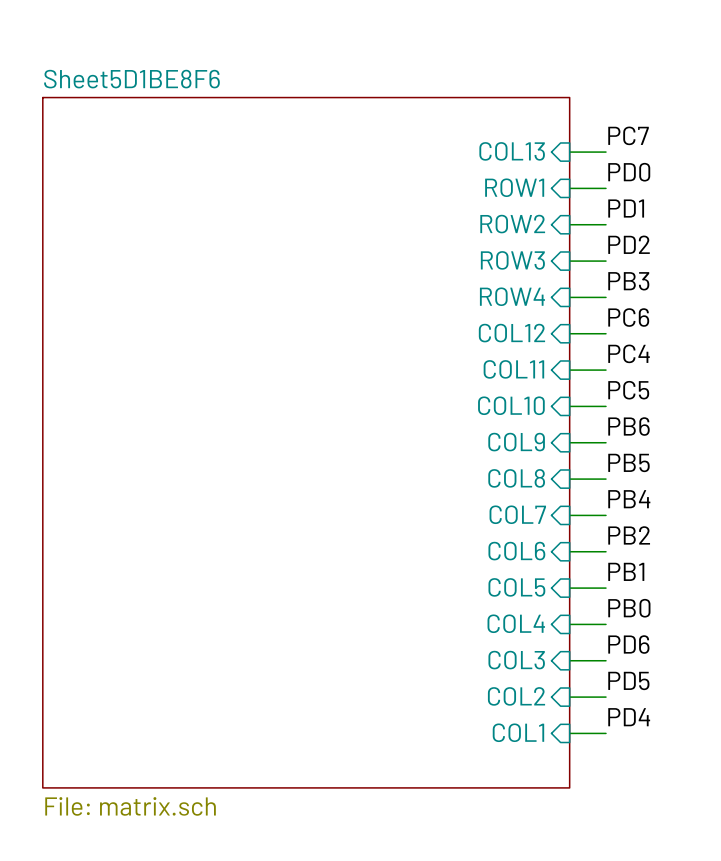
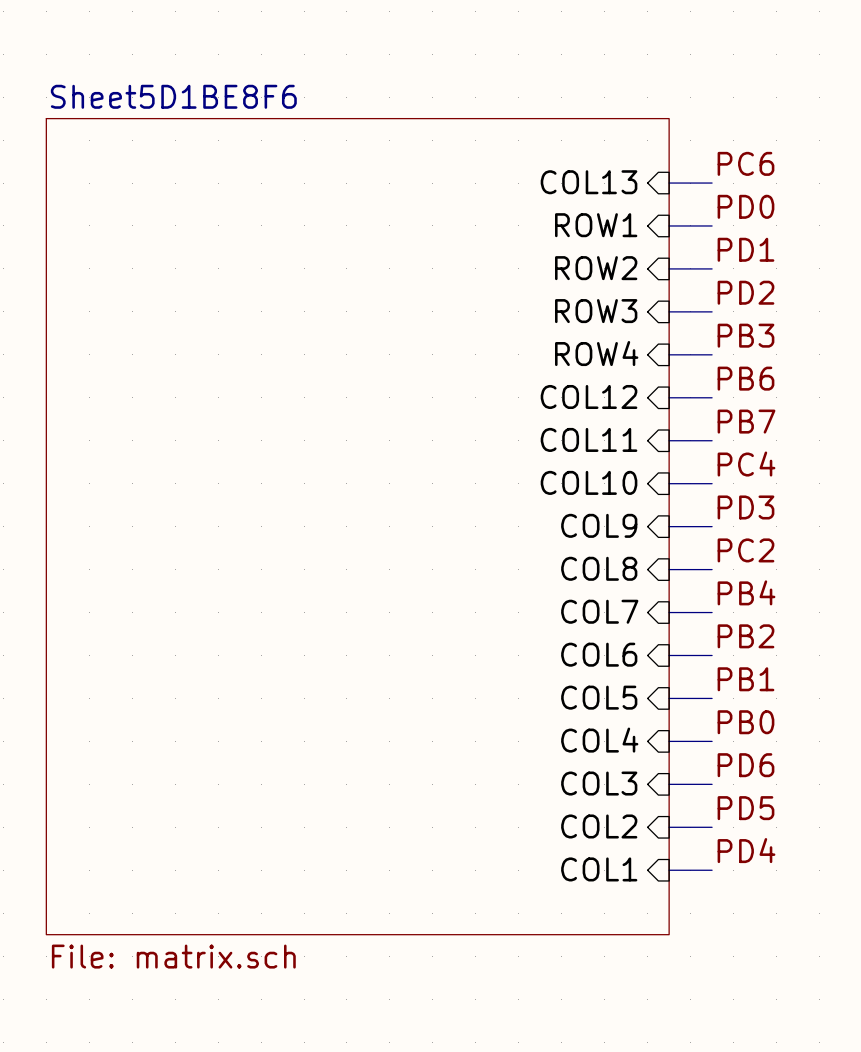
label: PC7 (628, 135) -> PC6 (745, 163)
label: PC6 (628, 317) -> PB6 (745, 378)
label: PC4 (629, 353) -> PB7 (746, 421)
label: PC5 (628, 390) -> PC4 (746, 464)
label: PB6 (628, 426) -> PD3 (745, 507)
label: PB5 (628, 462) -> PC2 (745, 550)

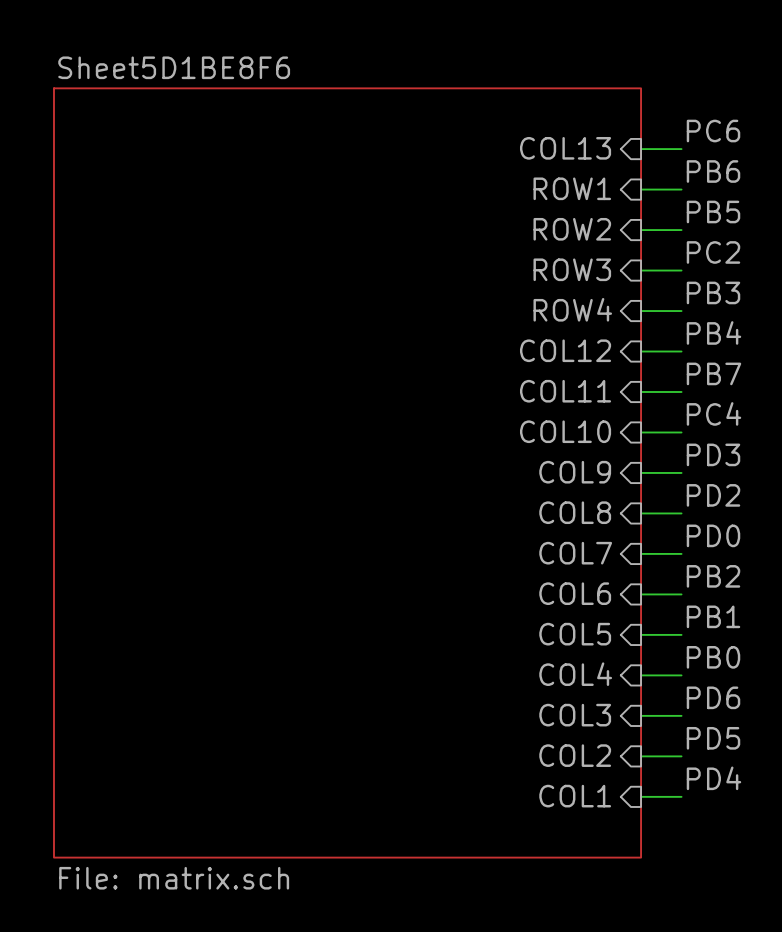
label: PD0 (745, 206) -> PB6 (713, 171)
label: PD1 (745, 249) -> PB5 (713, 211)
label: PD2 (745, 292) -> PC2 (713, 252)
label: PB6 (745, 378) -> PB4 (713, 332)
label: PC2 (745, 550) -> PD2 (713, 495)
label: PB4 (746, 592) -> PD0 (713, 535)

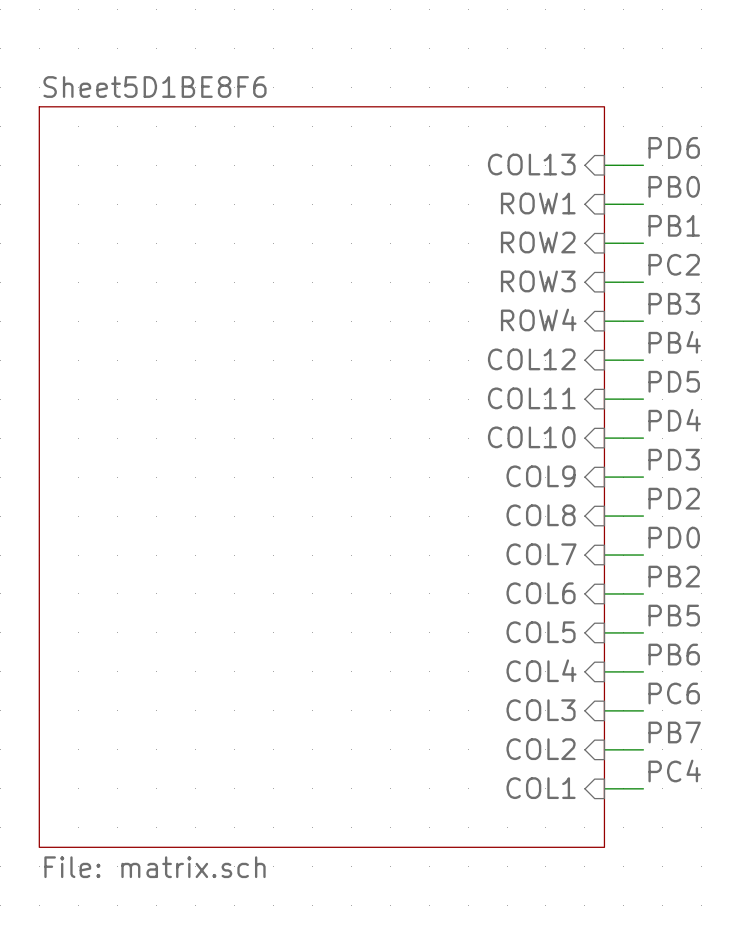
label: PC6 (713, 131) -> PD6 (674, 147)
label: PB6 (713, 171) -> PB0 (674, 186)
label: PB5 (713, 211) -> PB1 (674, 225)
label: PB7 (713, 373) -> PD5 (674, 381)
label: PC4 (713, 413) -> PD4 (674, 420)
label: PB1 (713, 616) -> PB5 (674, 615)
label: PB0 (713, 657) -> PB6 (674, 654)
label: PD6 (713, 697) -> PC6 (674, 693)
label: PD5 (713, 738) -> PB7 (674, 732)
label: PD4 (713, 778) -> PC4 (674, 771)

